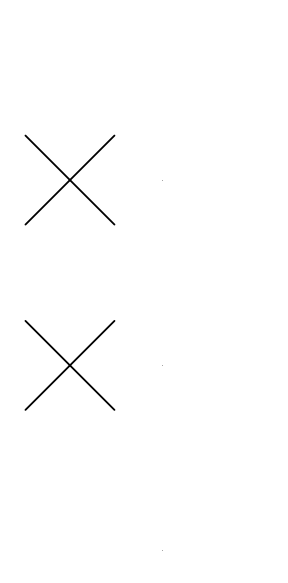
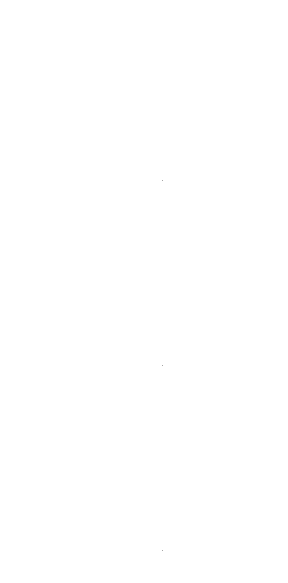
no-connect mark: (69, 180) -> none
no-connect mark: (69, 365) -> none

